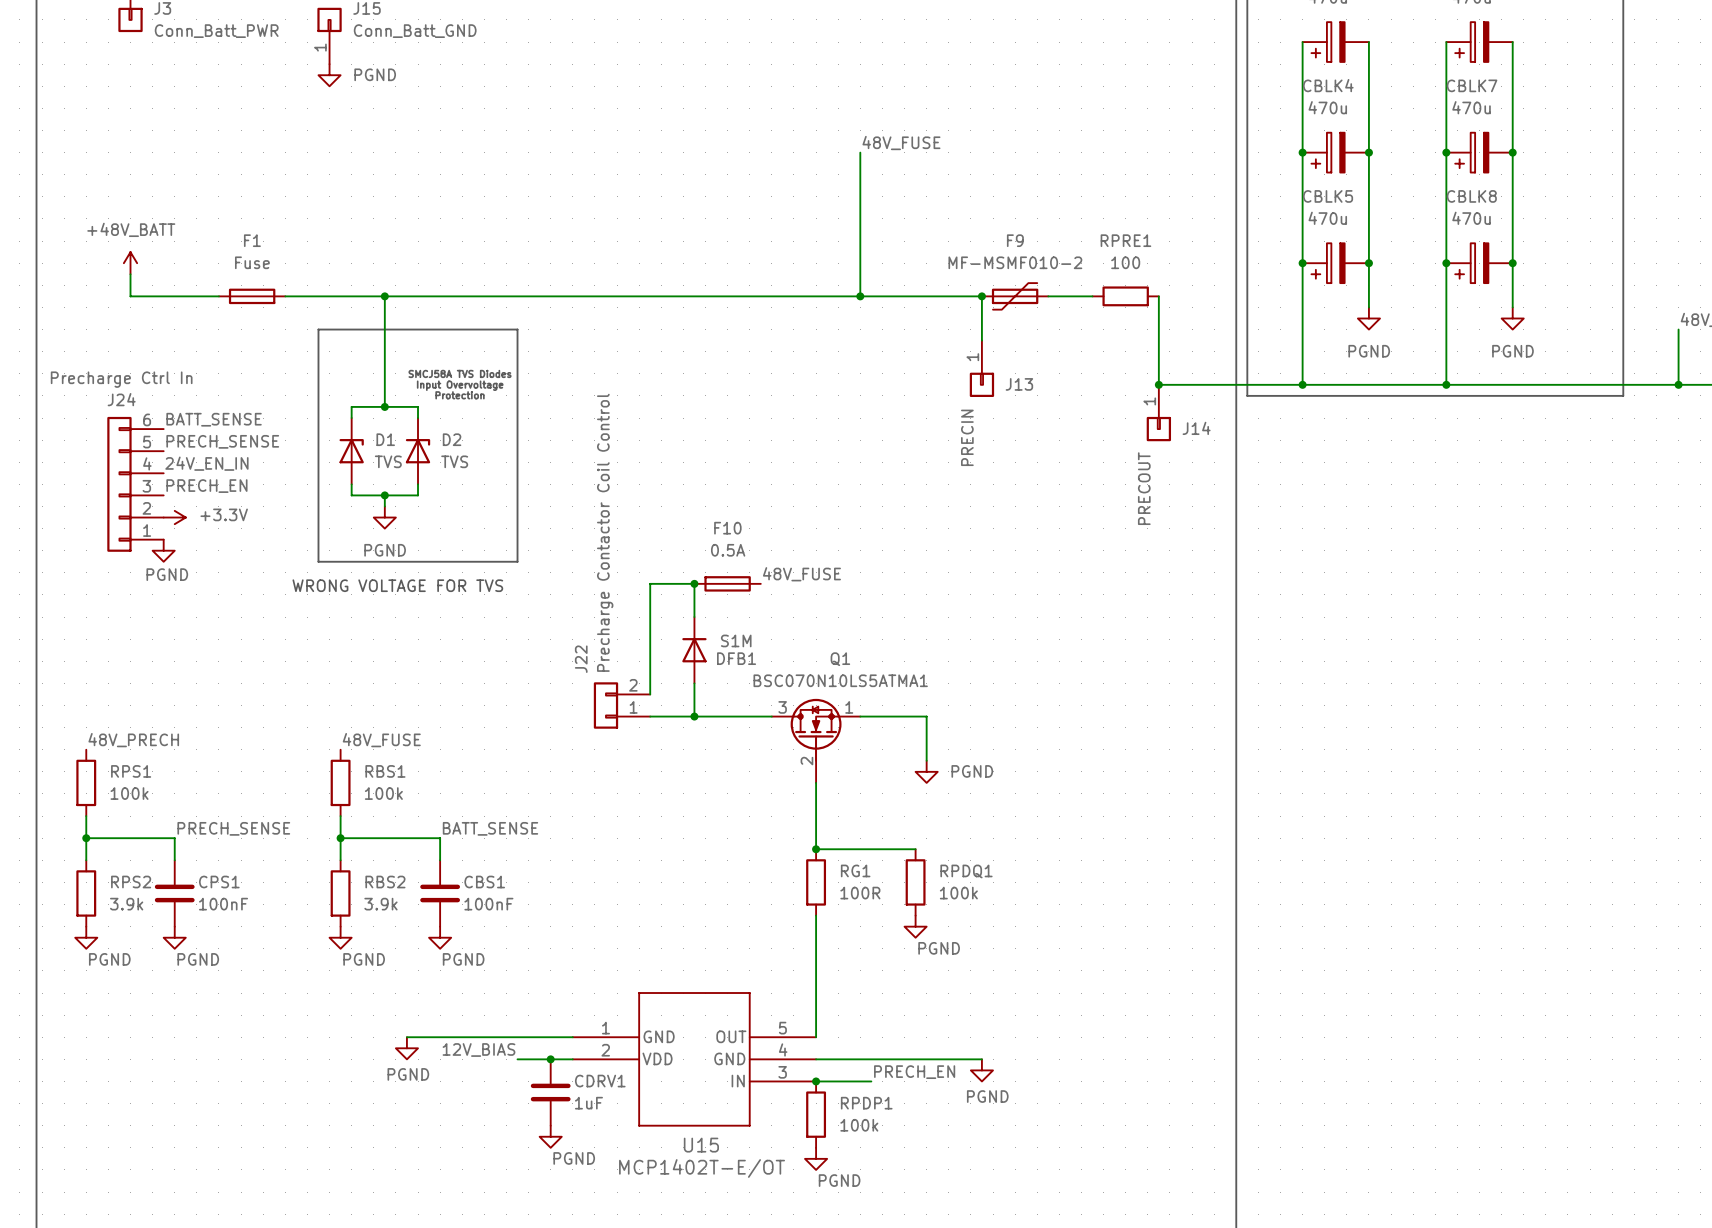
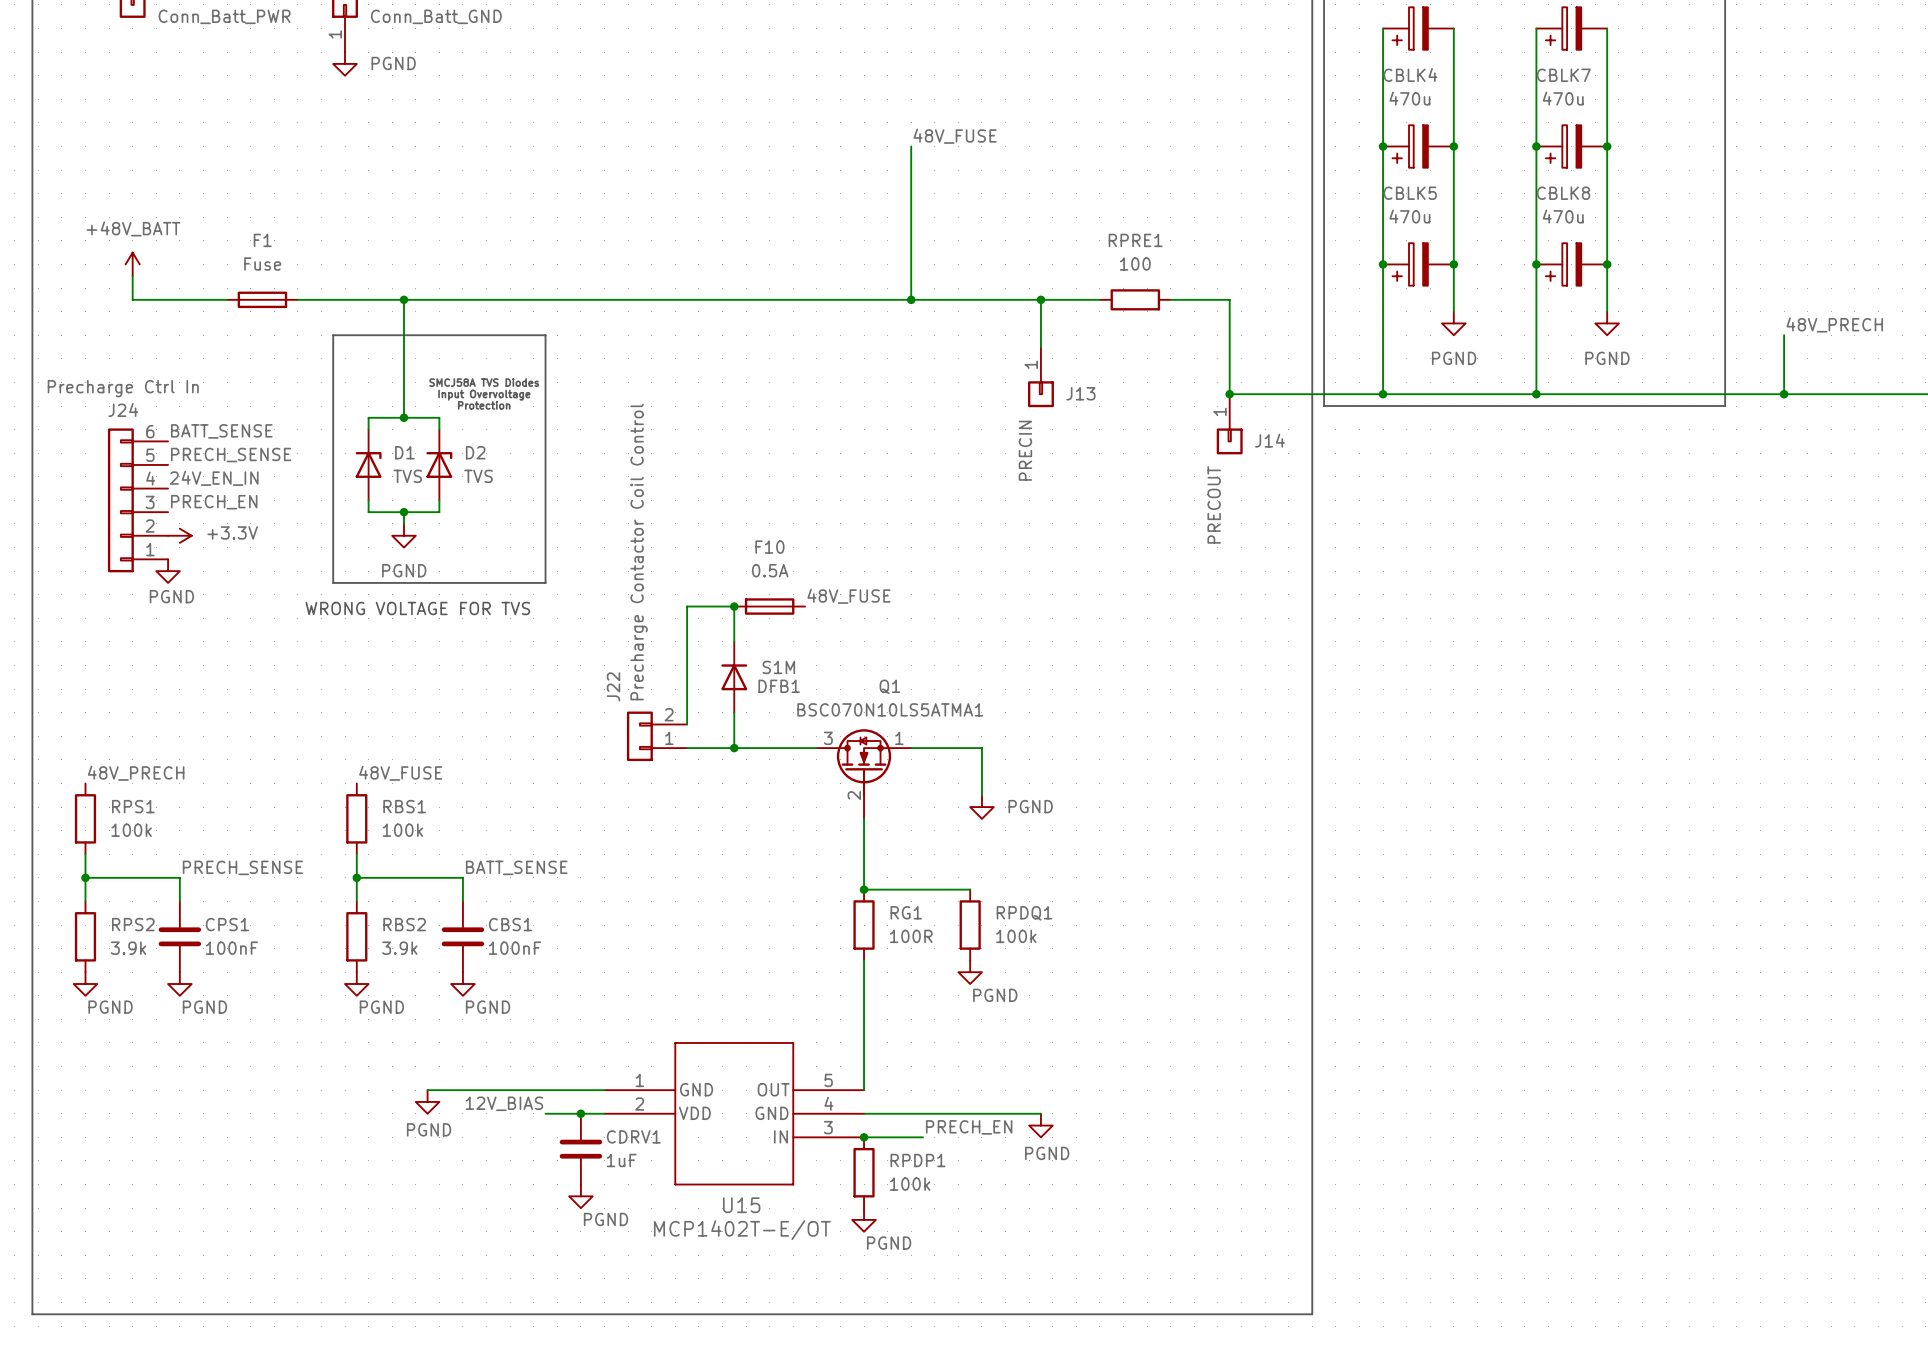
F9: MF-MSMF010-2 (1015, 296) -> none
wire: (1048, 296) (1092, 296) -> none
wire: none -> (1170, 299) (1229, 299)
RPRE1 position: (1125, 296) -> (1135, 299)

